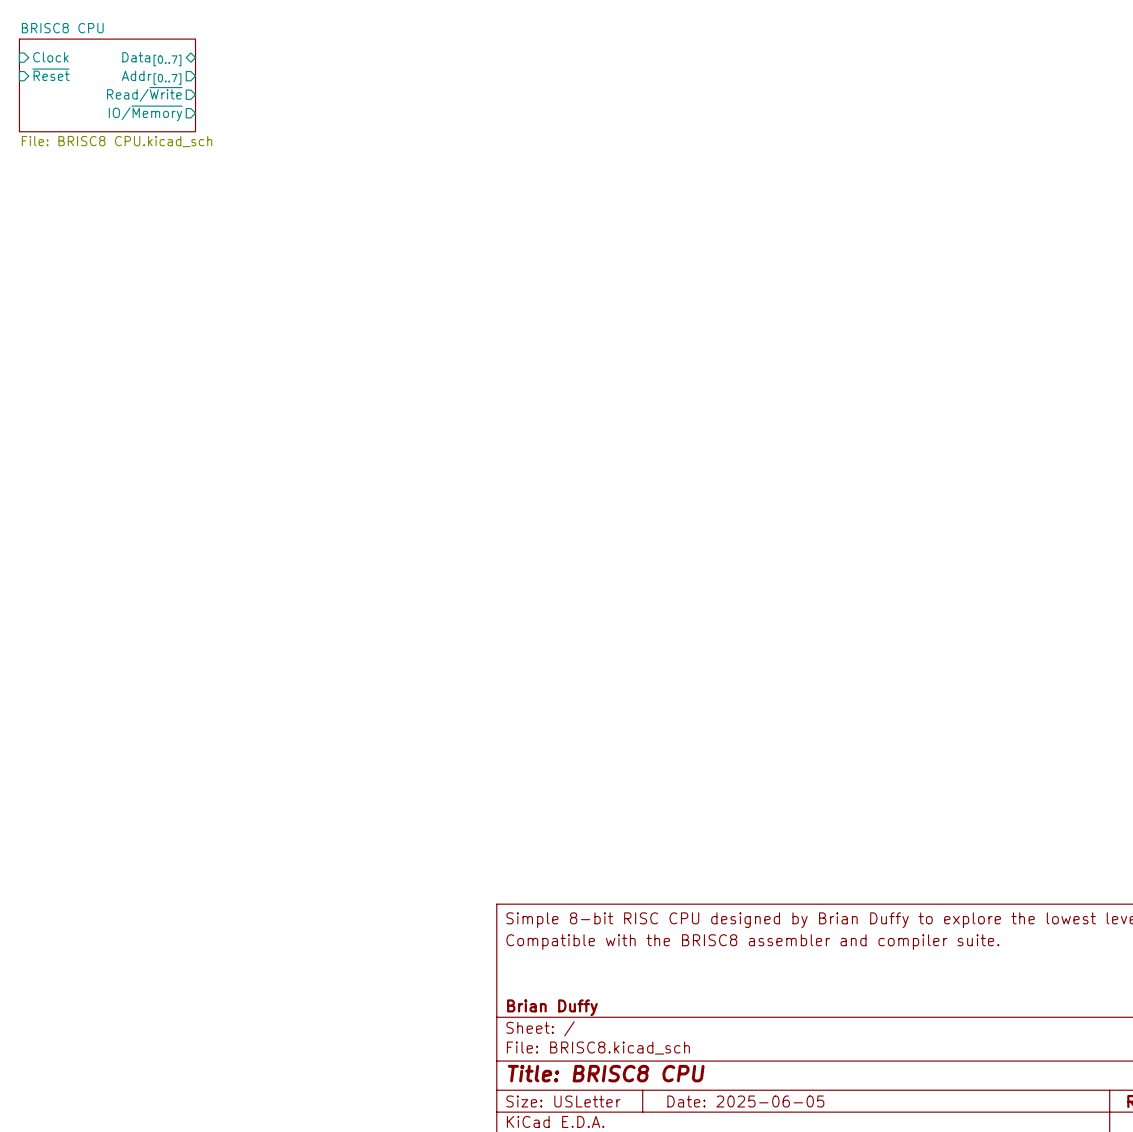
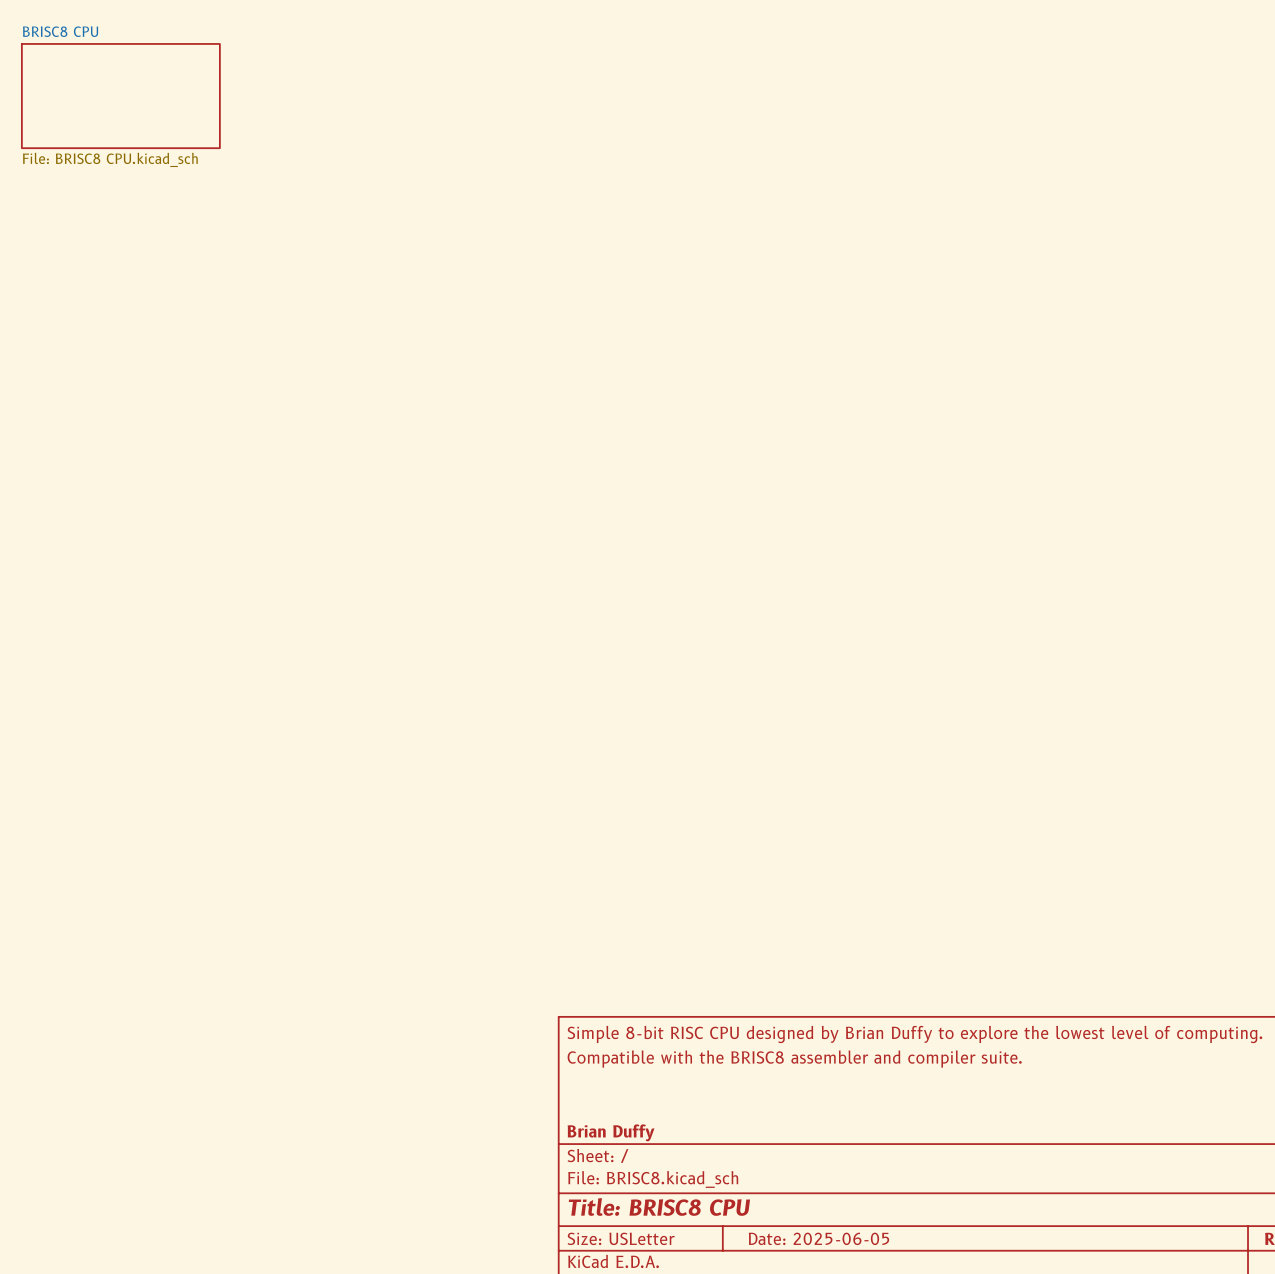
sheet pin: Clock (50, 57) -> none
sheet pin: Data[0..7] (151, 59) -> none
sheet pin: ~{Reset} (50, 74) -> none
sheet pin: Addr[0..7] (151, 77) -> none
sheet pin: Read/~{Write} (144, 94) -> none
sheet pin: IO/~{Memory} (145, 113) -> none

